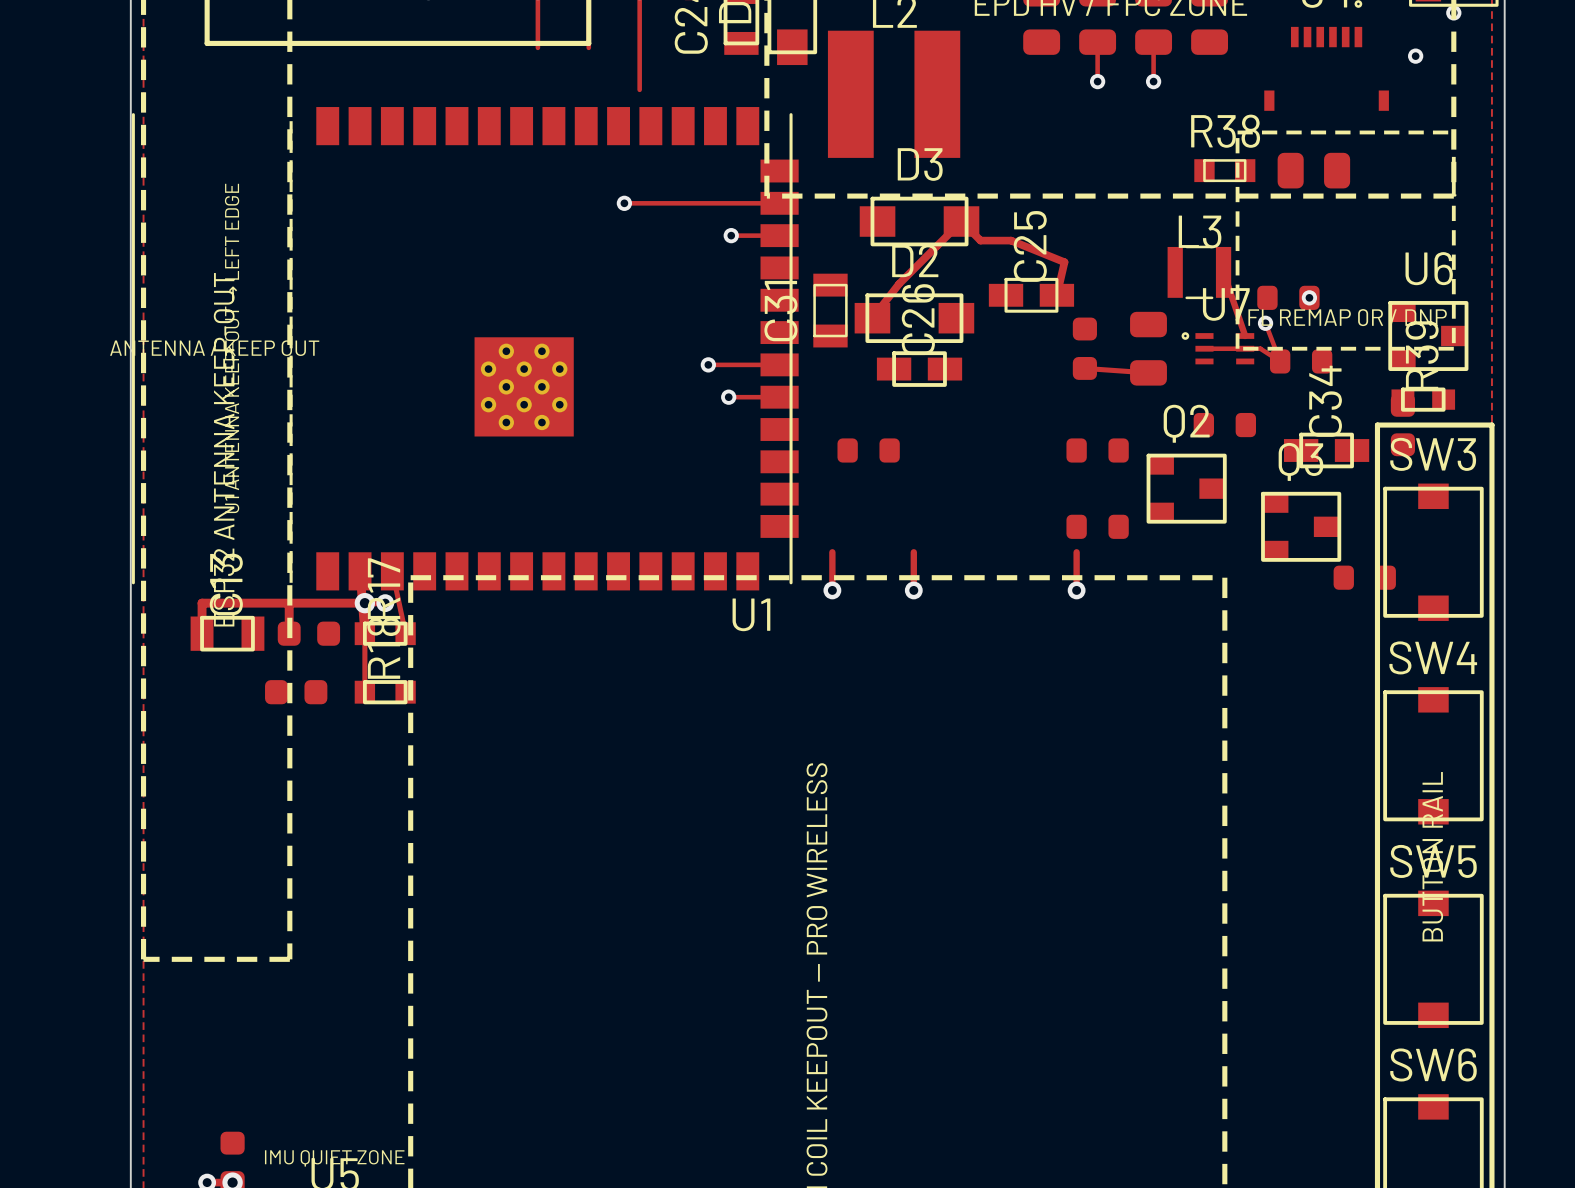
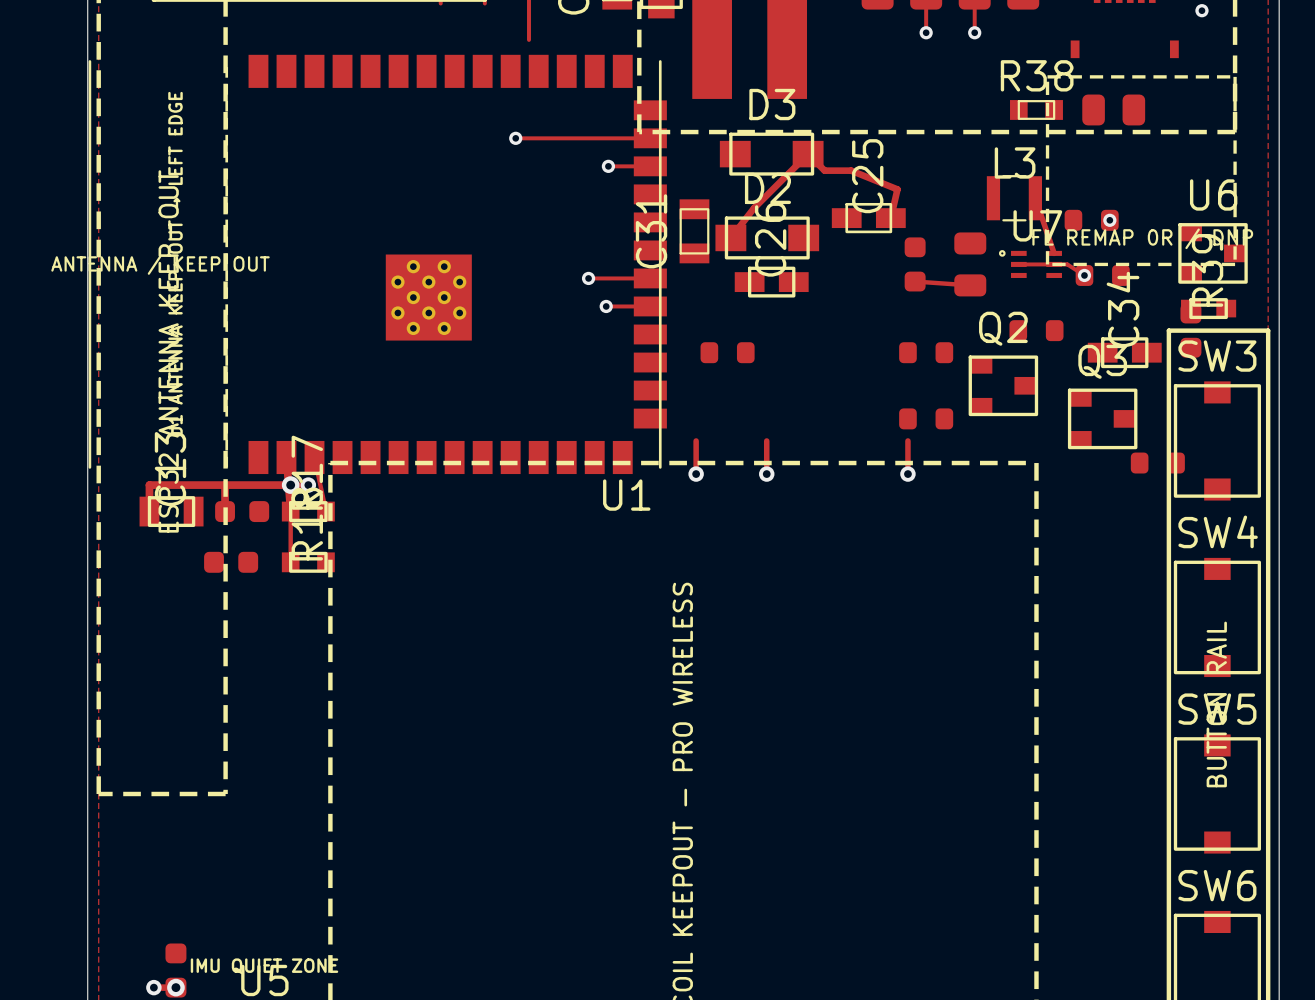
track: (1265, 323) (1280, 361) -> none
via position: (1265, 323) -> (1084, 275)

